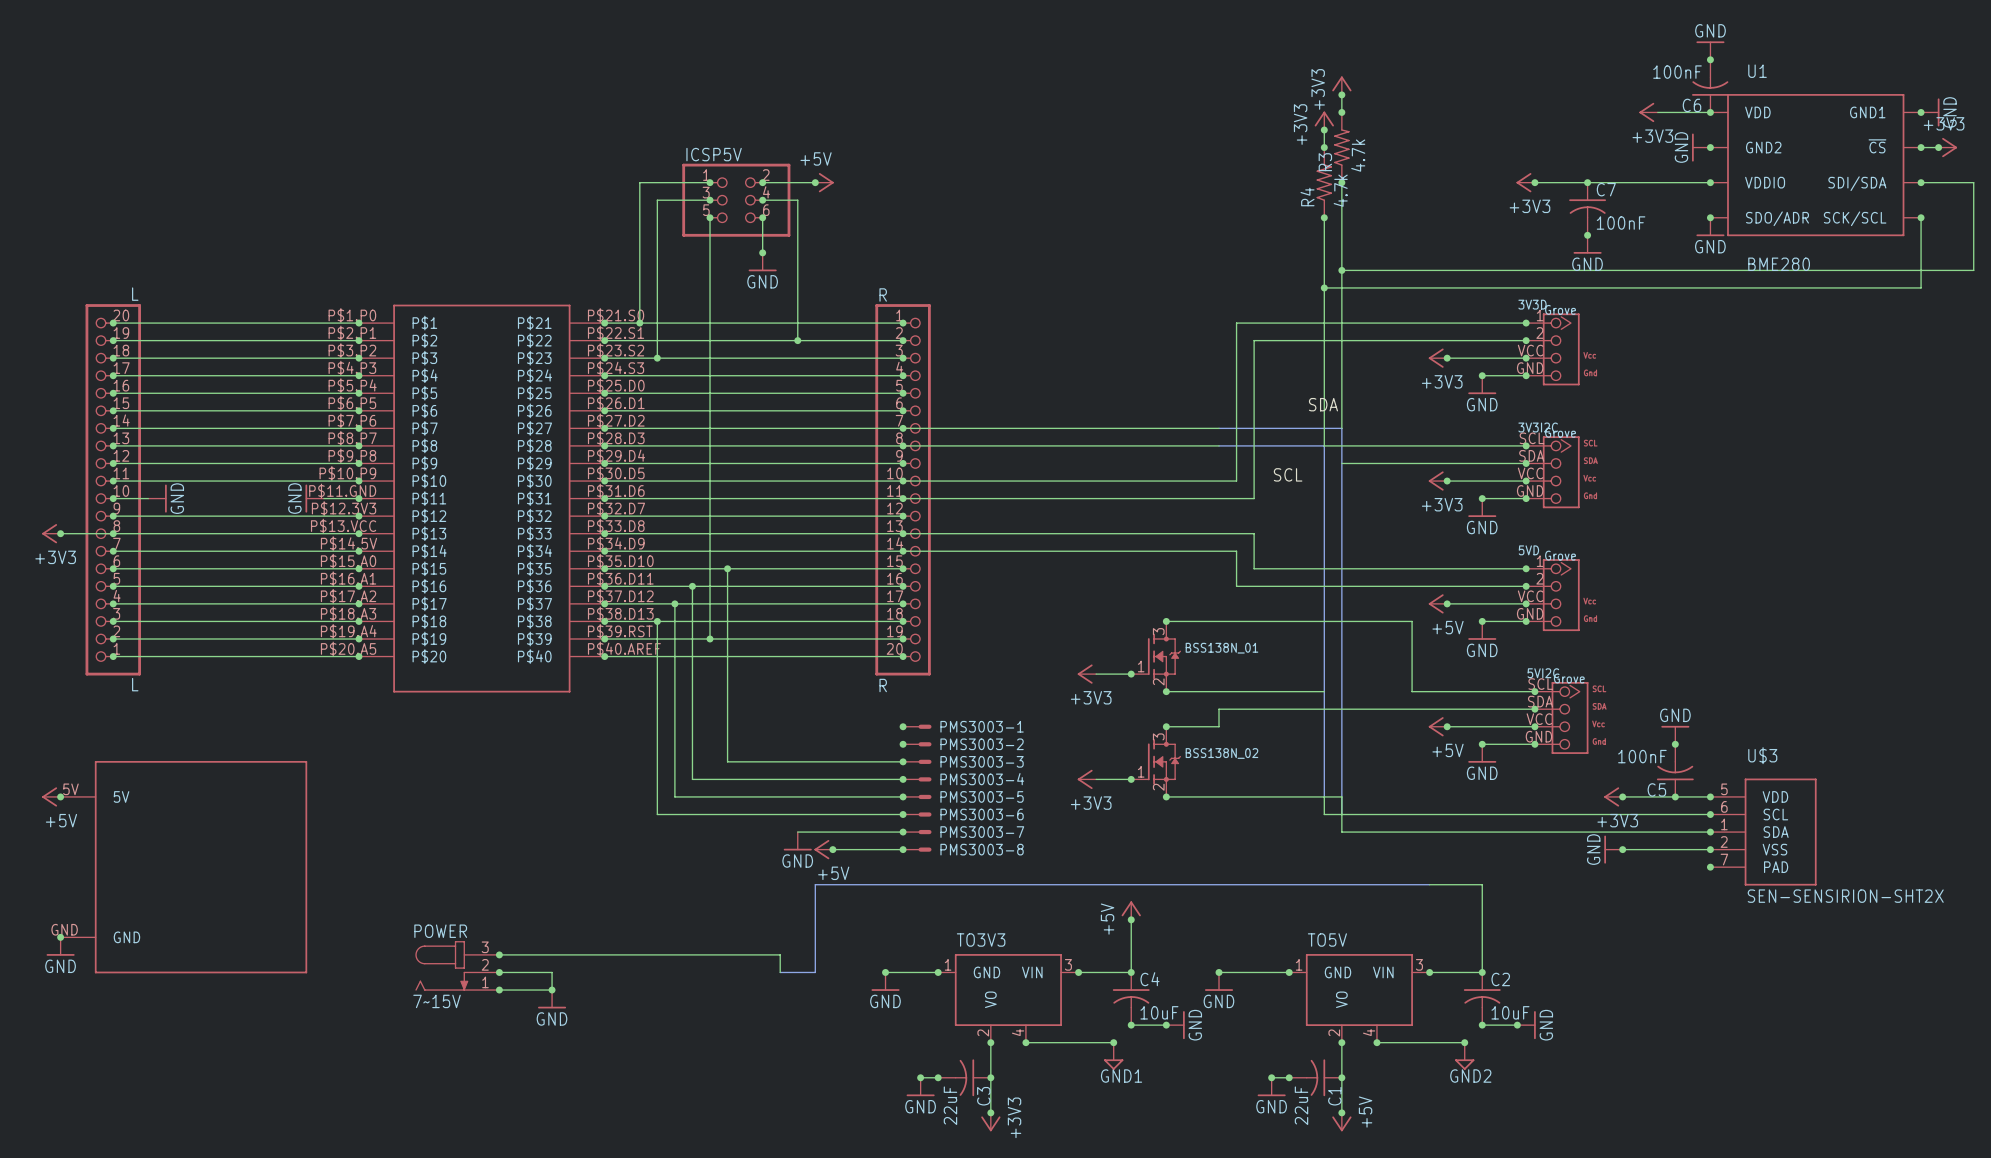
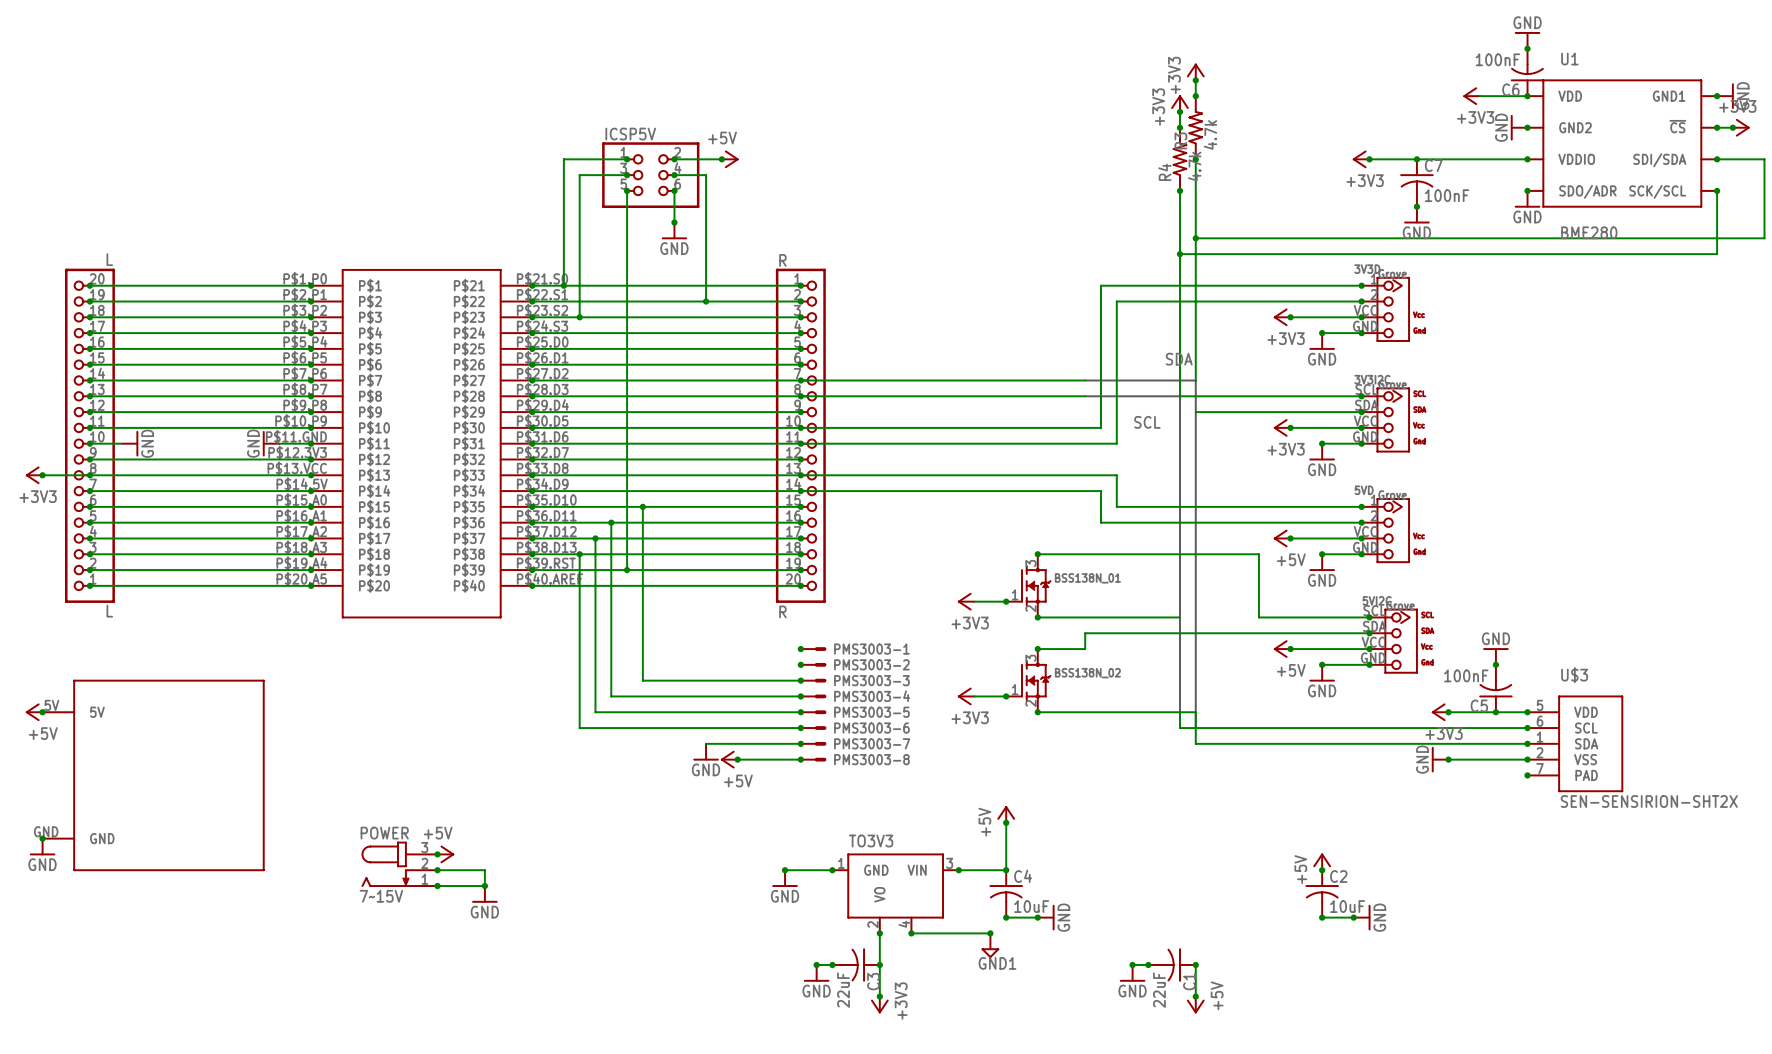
bus: (1429, 884) (815, 884) (815, 972) (780, 972) -> none
wire: (1429, 884) (1482, 884) (1482, 972) (1429, 972) -> none
wire: (499, 954) (780, 954) (780, 972) -> none
power symbol: none -> +5V (445, 854)
power symbol: none -> +5V (1322, 861)
wire: (1219, 972) (1289, 972) -> none
junction: (1219, 972) -> none
junction: (1289, 972) -> none
junction: (1429, 972) -> none
power symbol: GND (1219, 981) -> none
TO5V: (1359, 998) -> none
wire: (1341, 1042) (1341, 1077) -> none
junction: (1341, 1042) -> none
wire: (1376, 1042) (1464, 1042) -> none
junction: (1376, 1042) -> none
junction: (1464, 1042) -> none
power symbol: GND2 (1464, 1056) -> none

